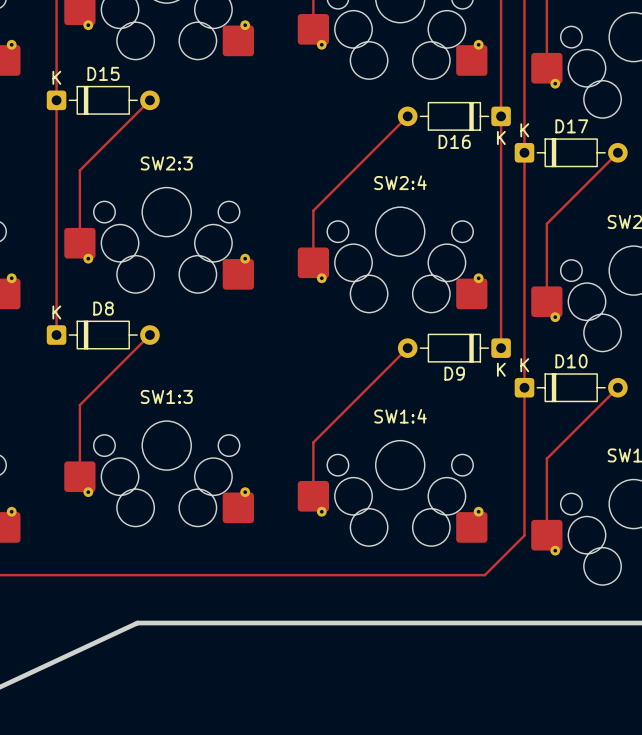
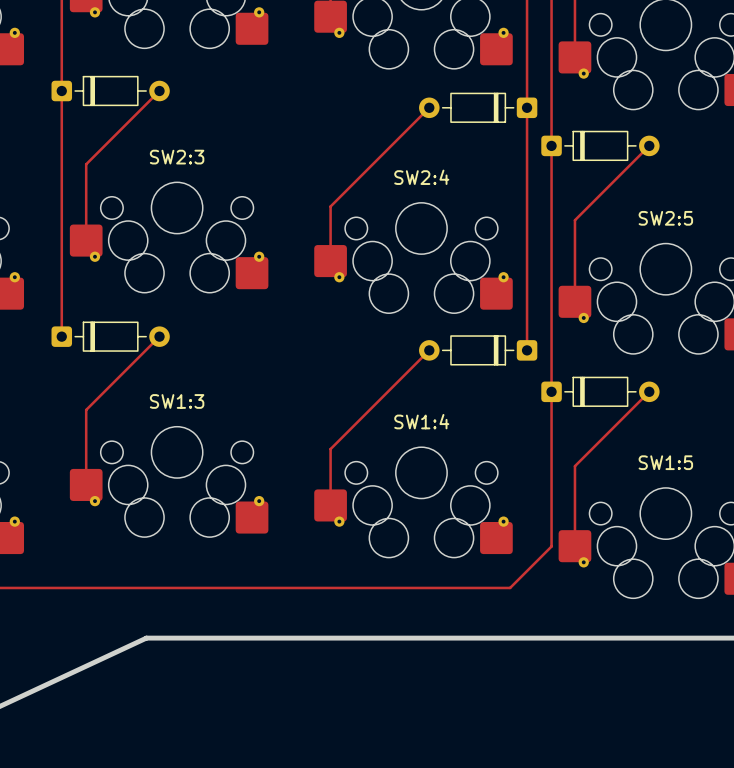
D15 name: D15 (103, 73) -> none
D15 text: K (56, 77) -> none
D17 name: D17 (571, 126) -> none
D17 text: K (524, 130) -> none
D16 text: K (501, 137) -> none
D16 name: D16 (454, 141) -> none
D8 name: D8 (103, 308) -> none
D8 text: K (56, 312) -> none
D10 name: D10 (571, 361) -> none
D10 text: K (524, 365) -> none
D9 text: K (501, 369) -> none
D9 name: D9 (454, 373) -> none

